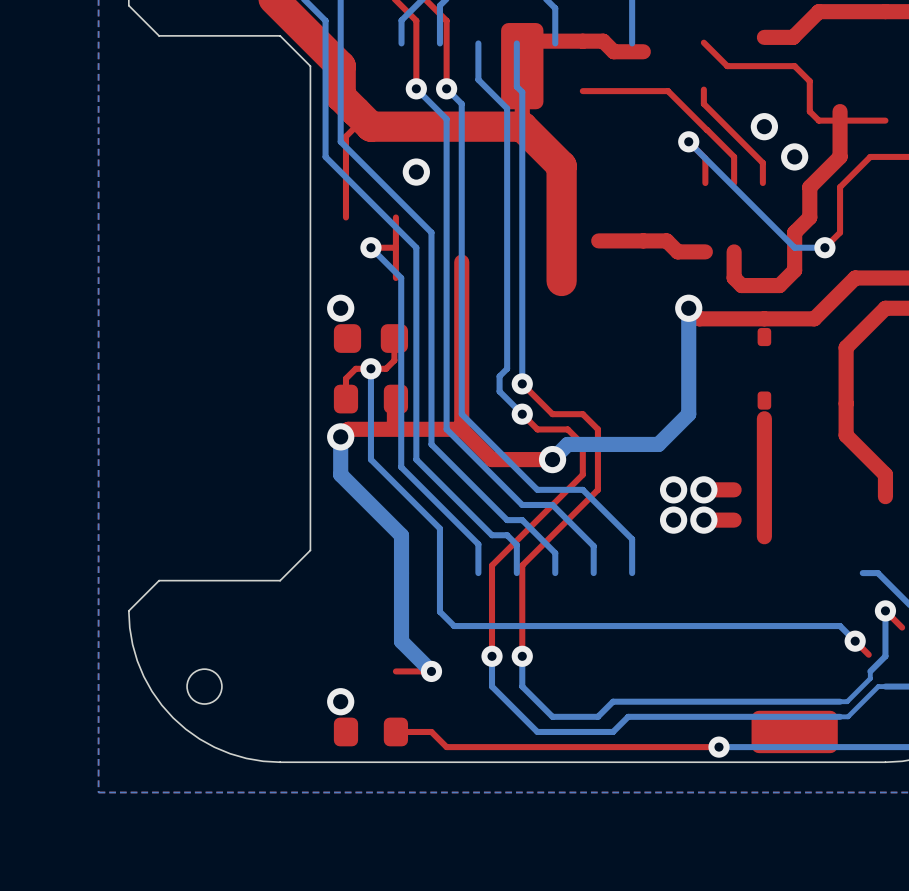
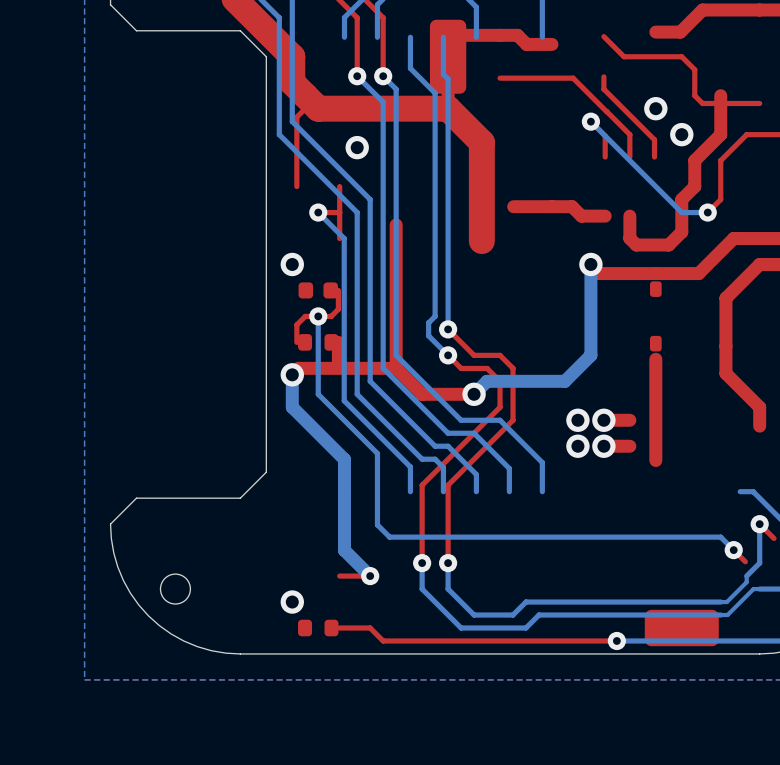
part footprint: [333, 324, 409, 353] -> [298, 282, 339, 299]
part footprint: [333, 384, 409, 414] -> [298, 334, 339, 351]
part footprint: [333, 717, 409, 747] -> [298, 619, 339, 637]

